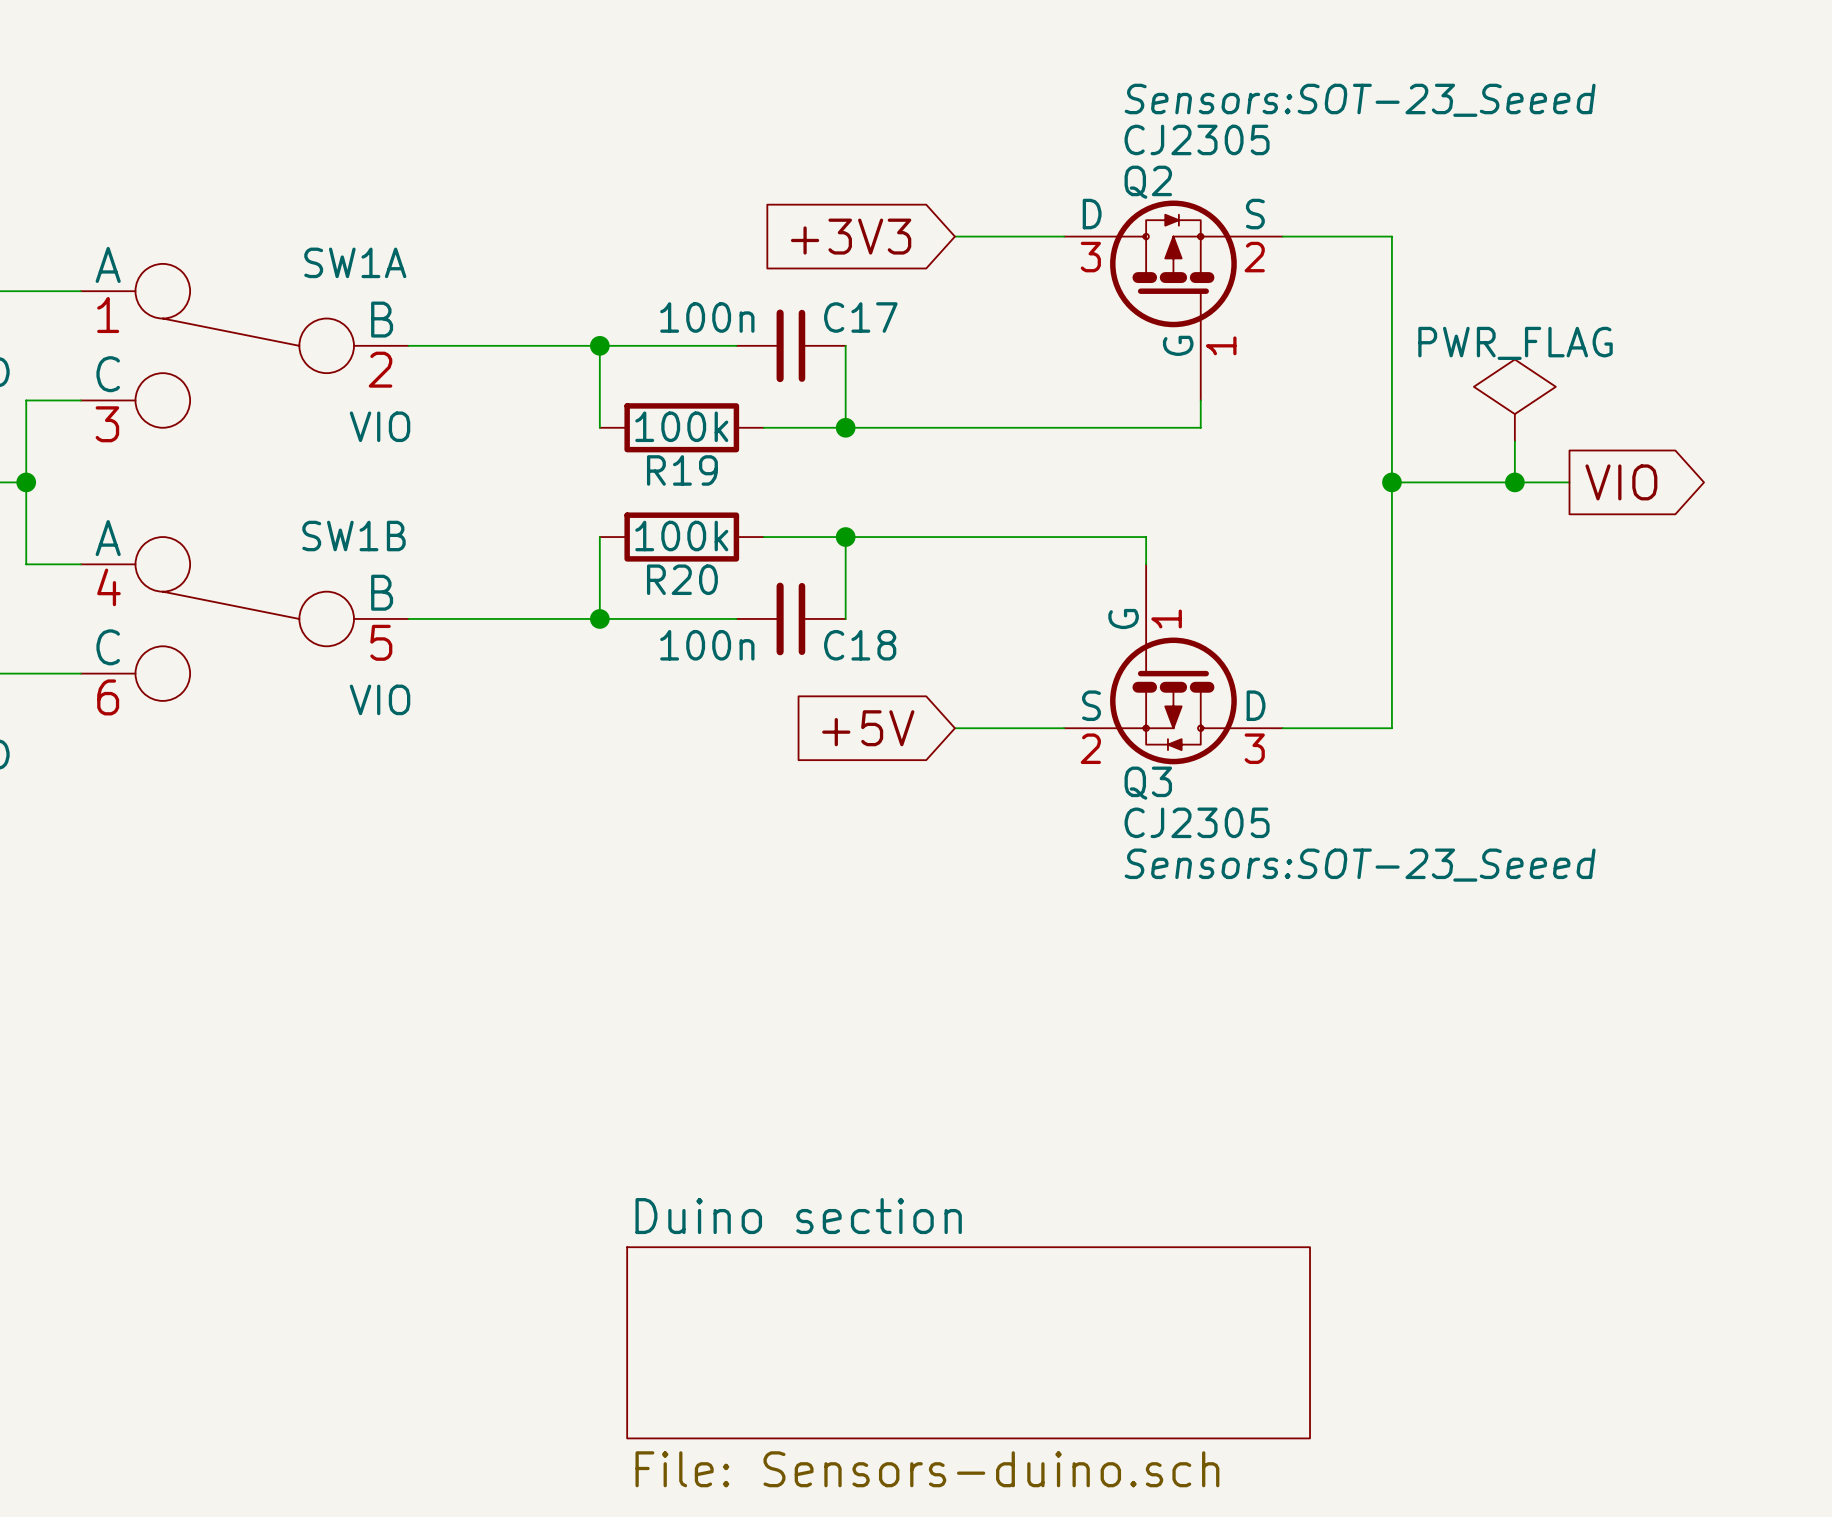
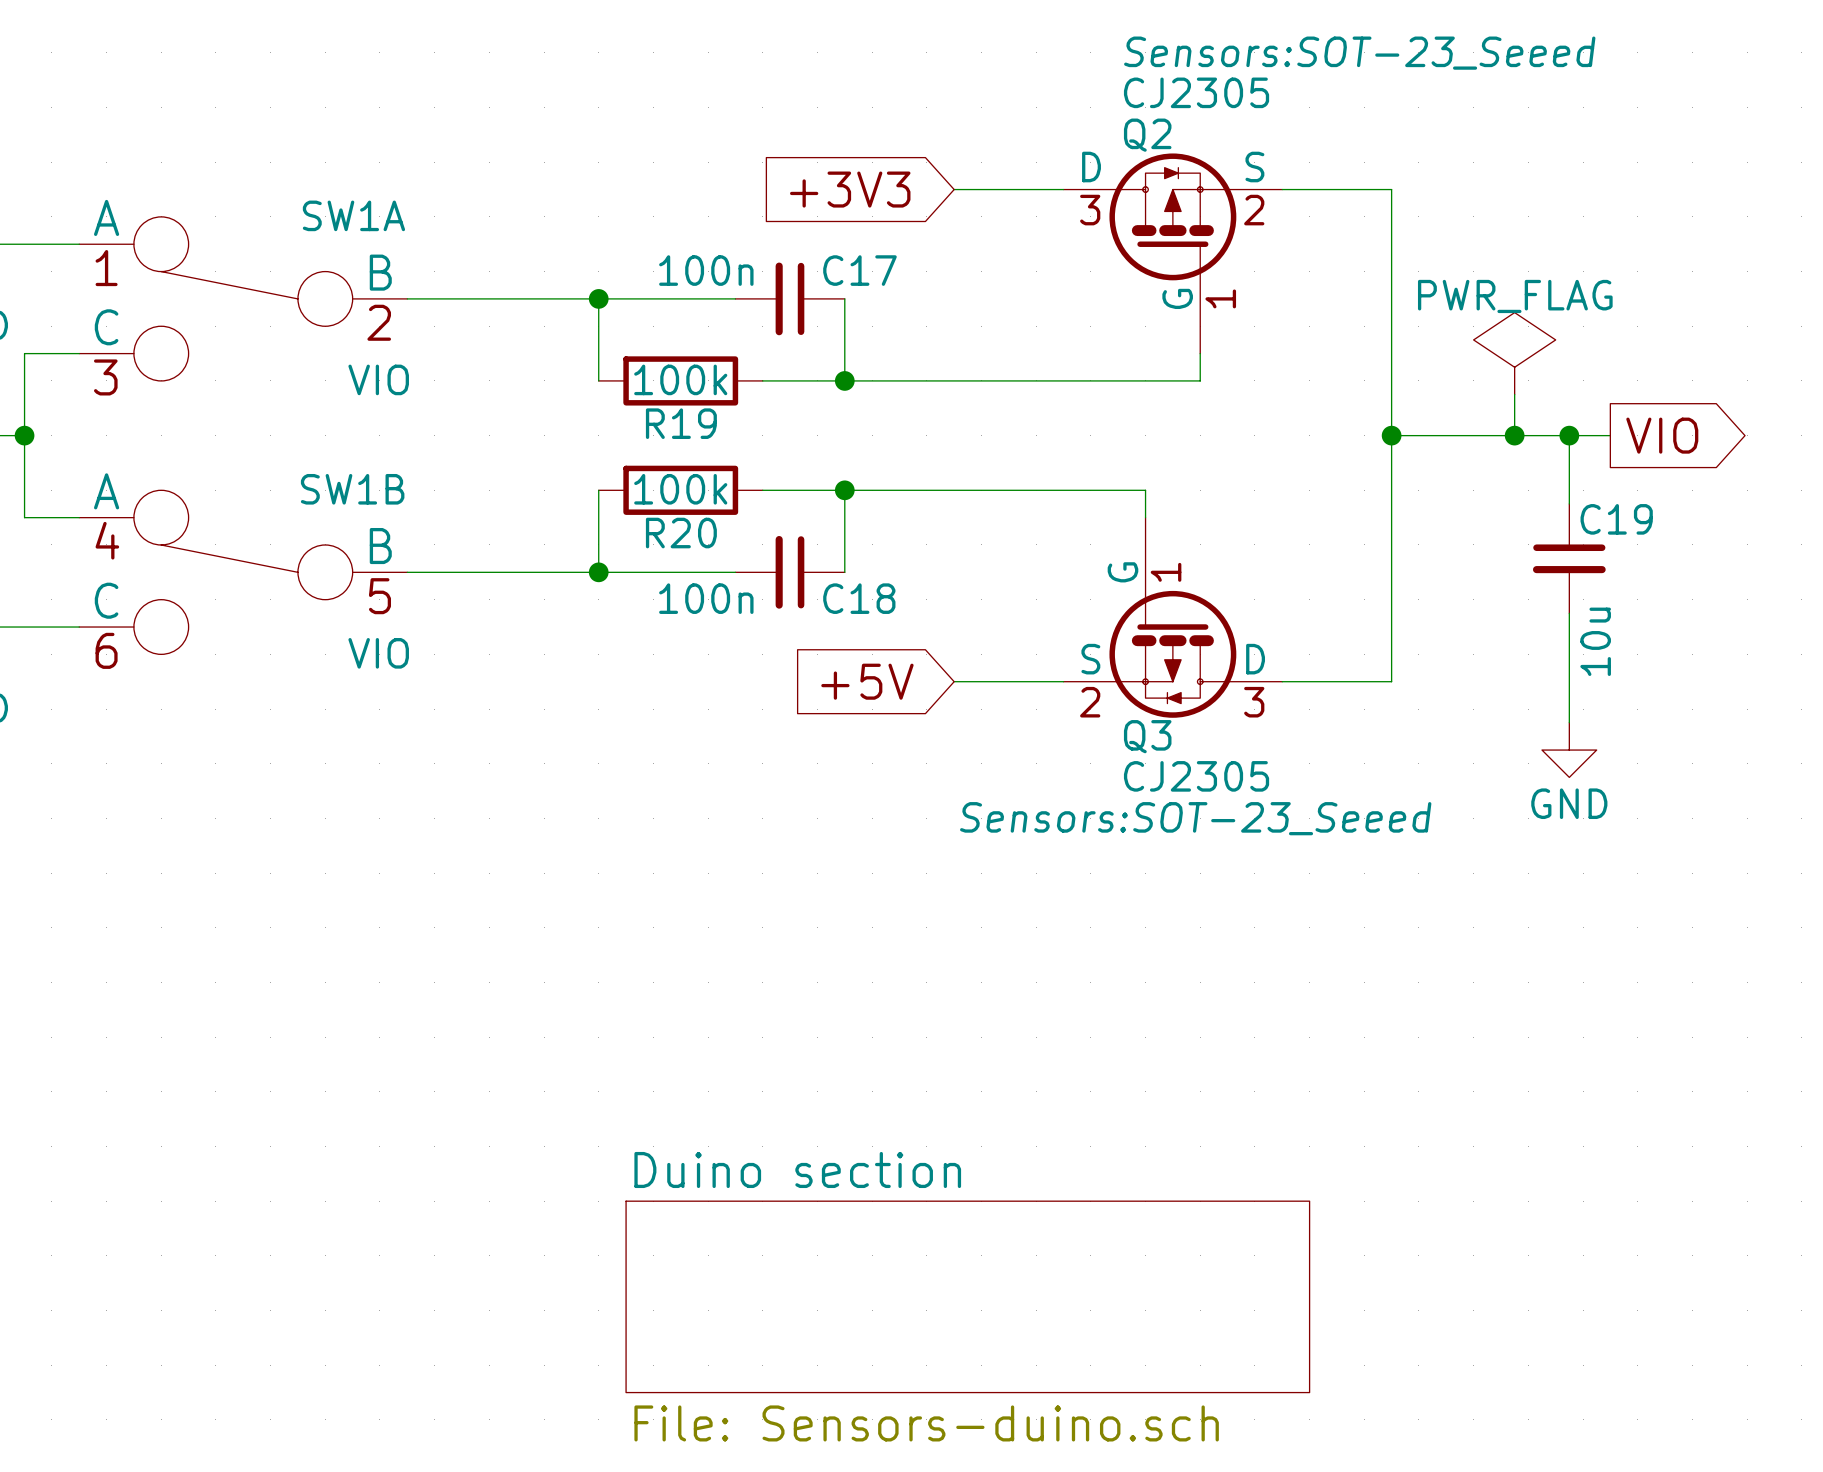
junction: none -> (1569, 435)
wire: none -> (1610, 435) (1569, 435) (1569, 503)
global label position: VIO (1621, 482) -> VIO (1662, 435)
C19: none -> 10u (1569, 558)
wire: none -> (1569, 613) (1569, 722)
power symbol: none -> GND (1569, 750)
Q3 text position: Sensors:SOT-23_Seeed (1360, 865) -> Sensors:SOT-23_Seeed (1195, 818)

